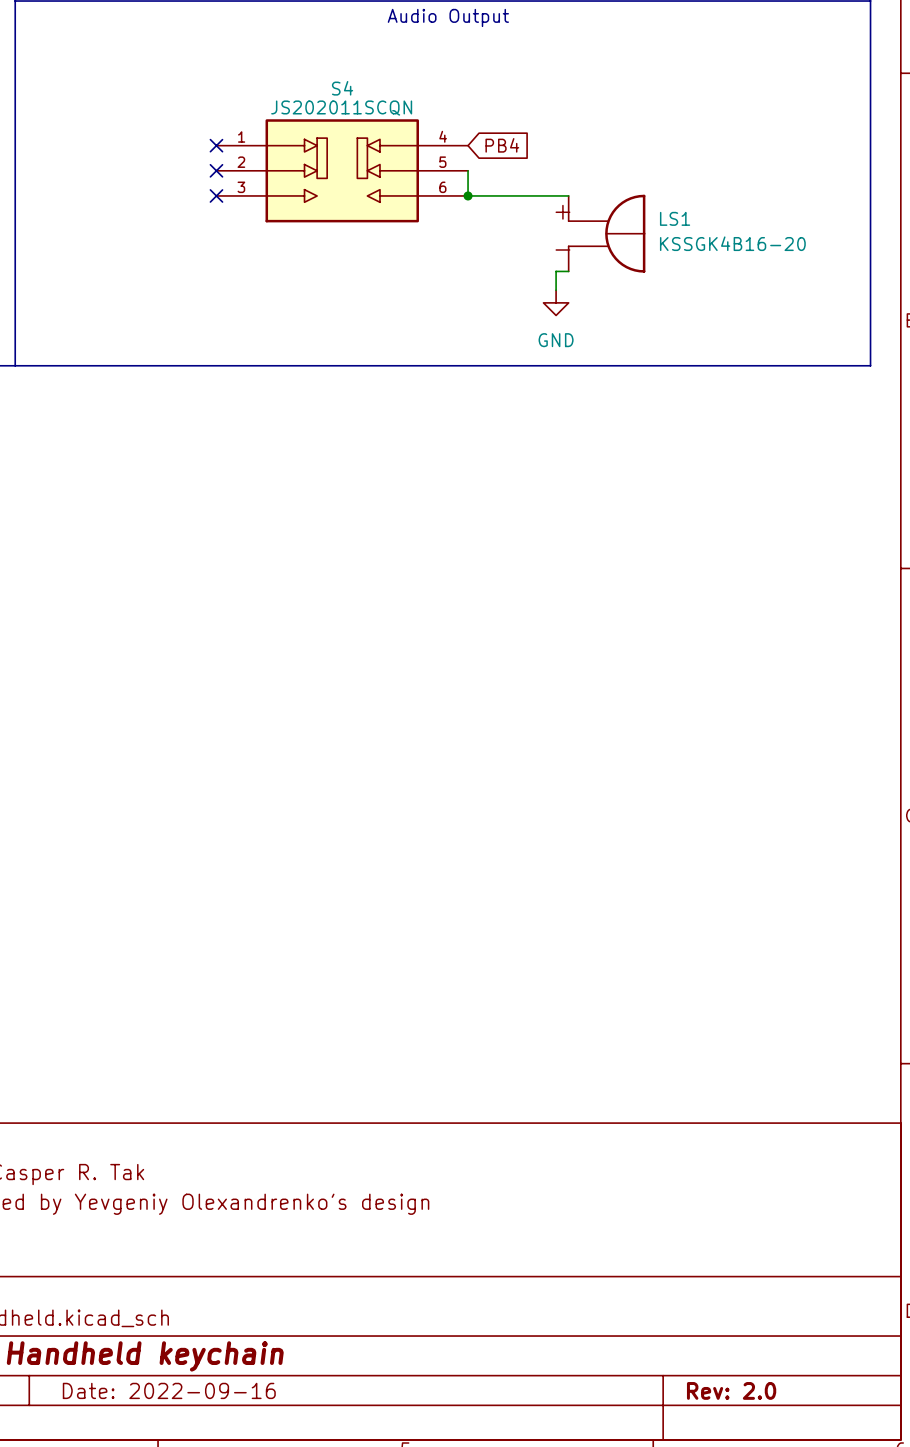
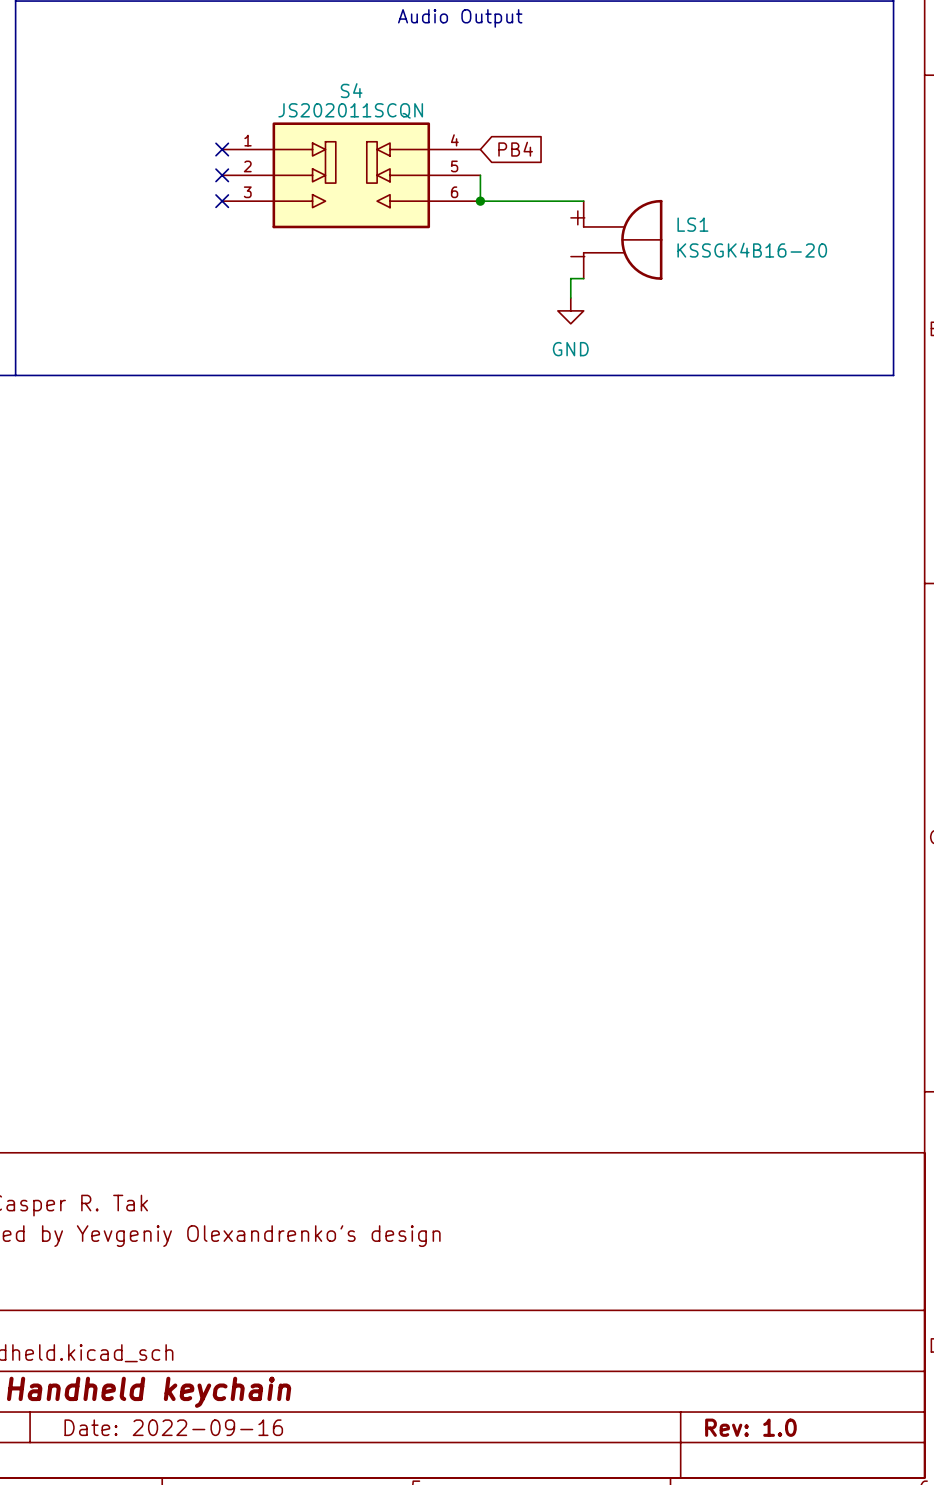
title block: Rev: 2.0 (731, 1390) -> Rev: 1.0 (750, 1427)

